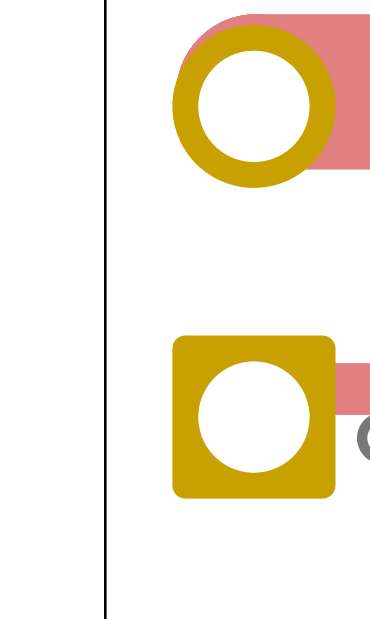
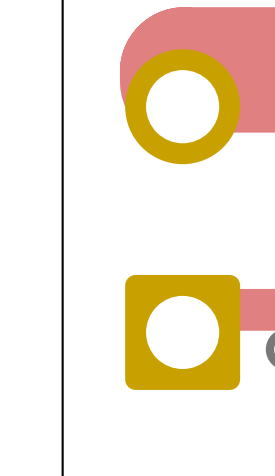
part footprint: [172, 24, 336, 499] -> [125, 49, 241, 390]

